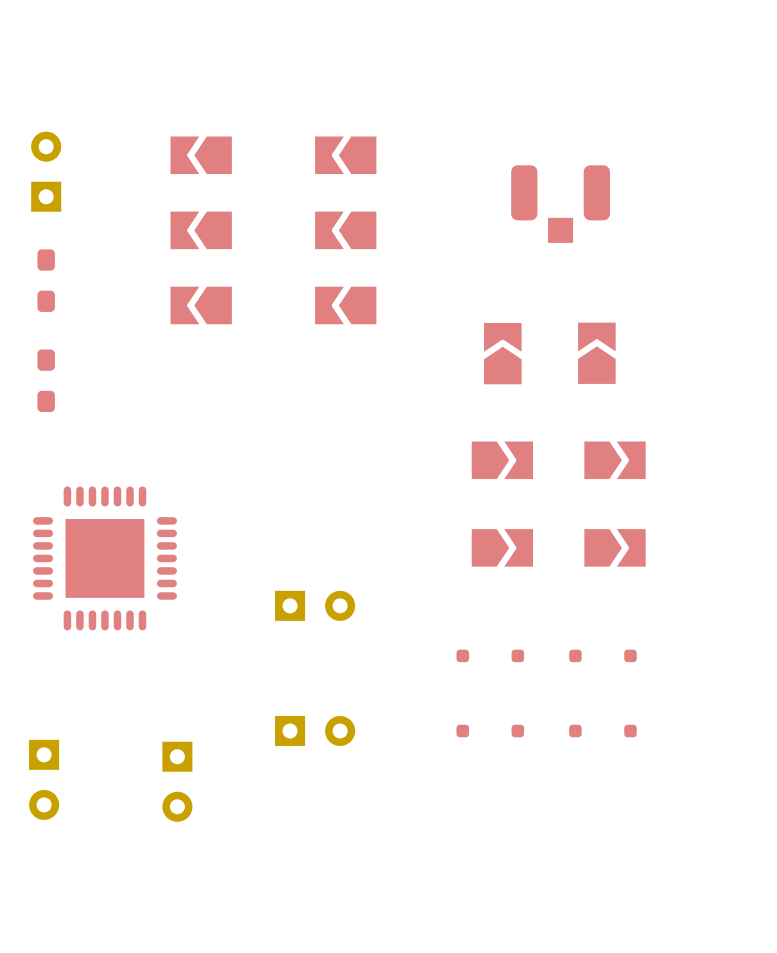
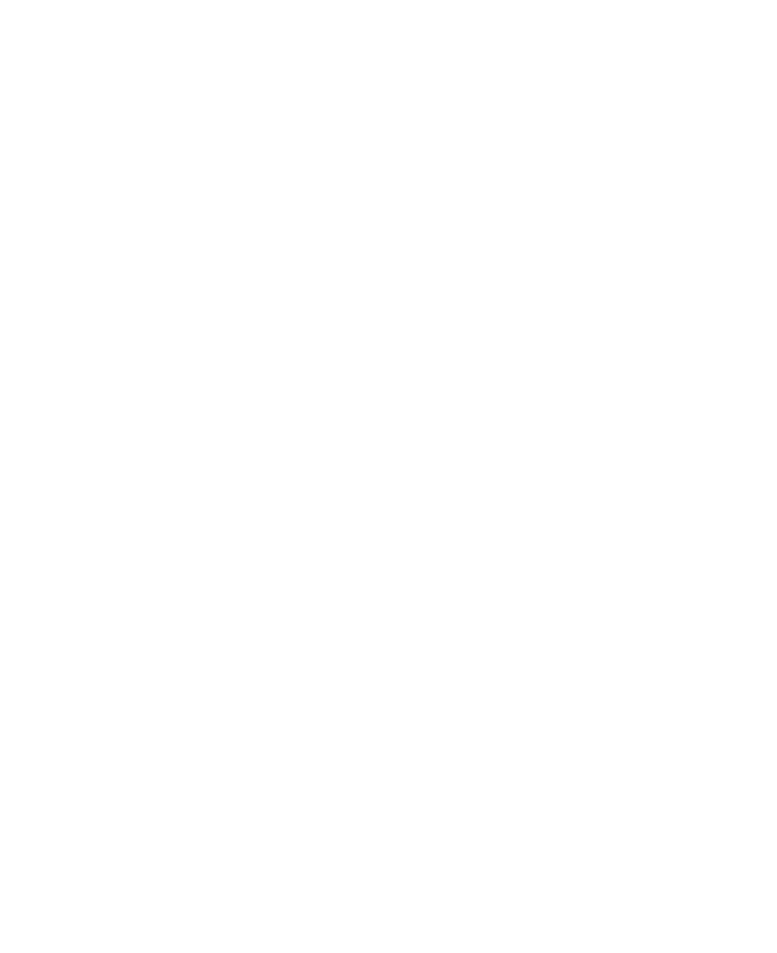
part: (201, 155) -> none
part: (345, 155) -> none
part: (46, 171) -> none
part: (560, 204) -> none
part: (201, 230) -> none
part: (345, 230) -> none
part: (46, 280) -> none
part: (201, 305) -> none
part: (345, 305) -> none
part: (502, 353) -> none
part: (596, 353) -> none
part: (46, 380) -> none
part: (502, 460) -> none
part: (615, 460) -> none
part: (502, 547) -> none
part: (615, 547) -> none
part: (104, 558) -> none
part: (315, 605) -> none
part: (490, 655) -> none
part: (602, 655) -> none
part: (315, 731) -> none
part: (490, 731) -> none
part: (602, 731) -> none
part: (44, 779) -> none
part: (177, 781) -> none

